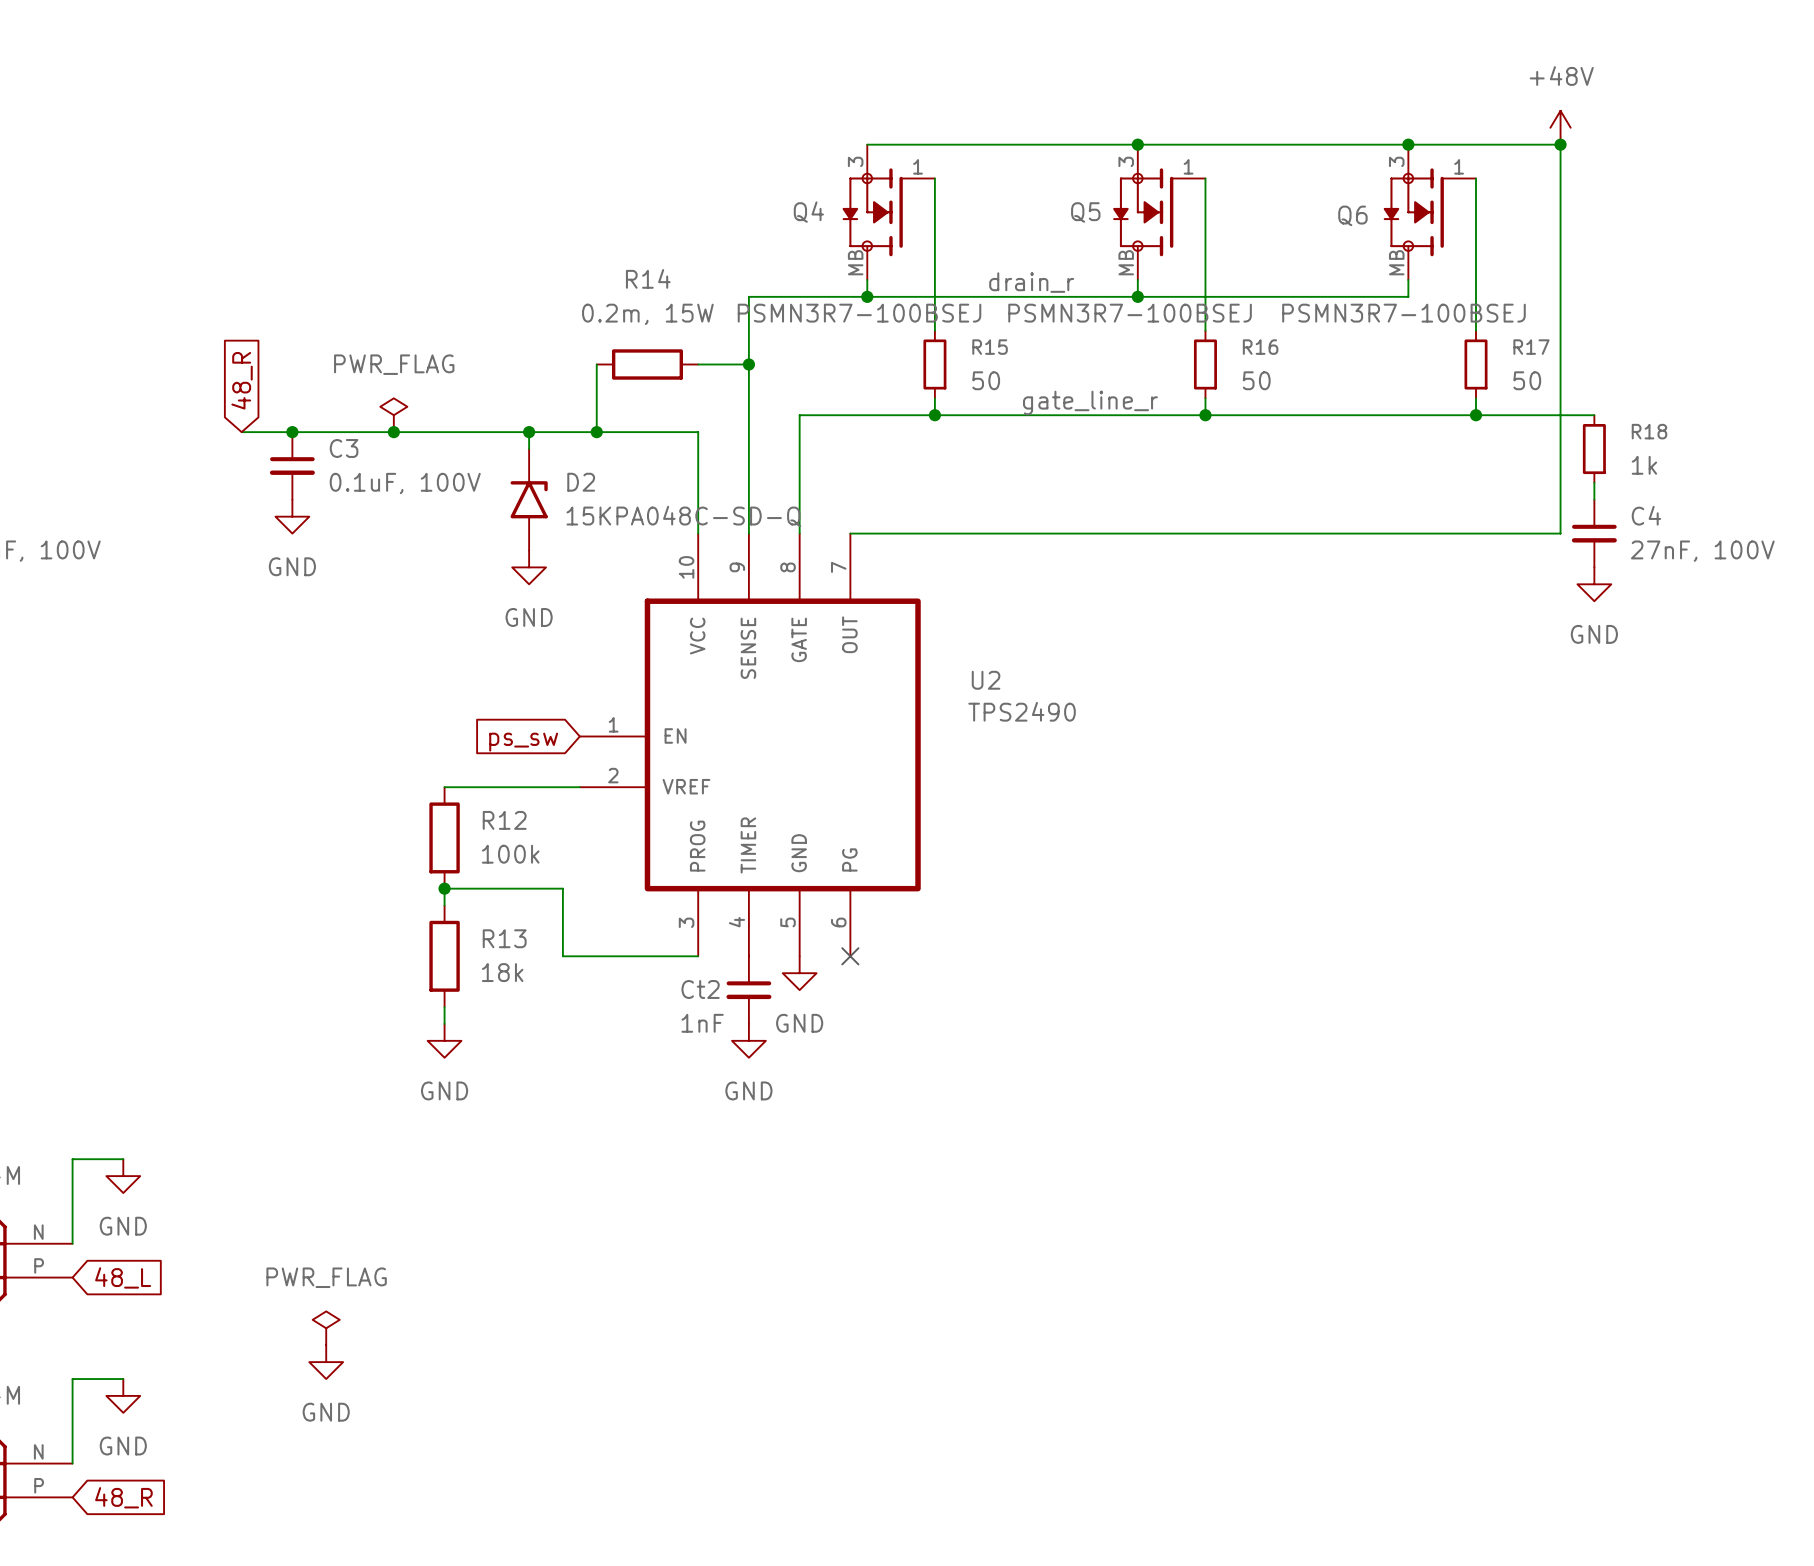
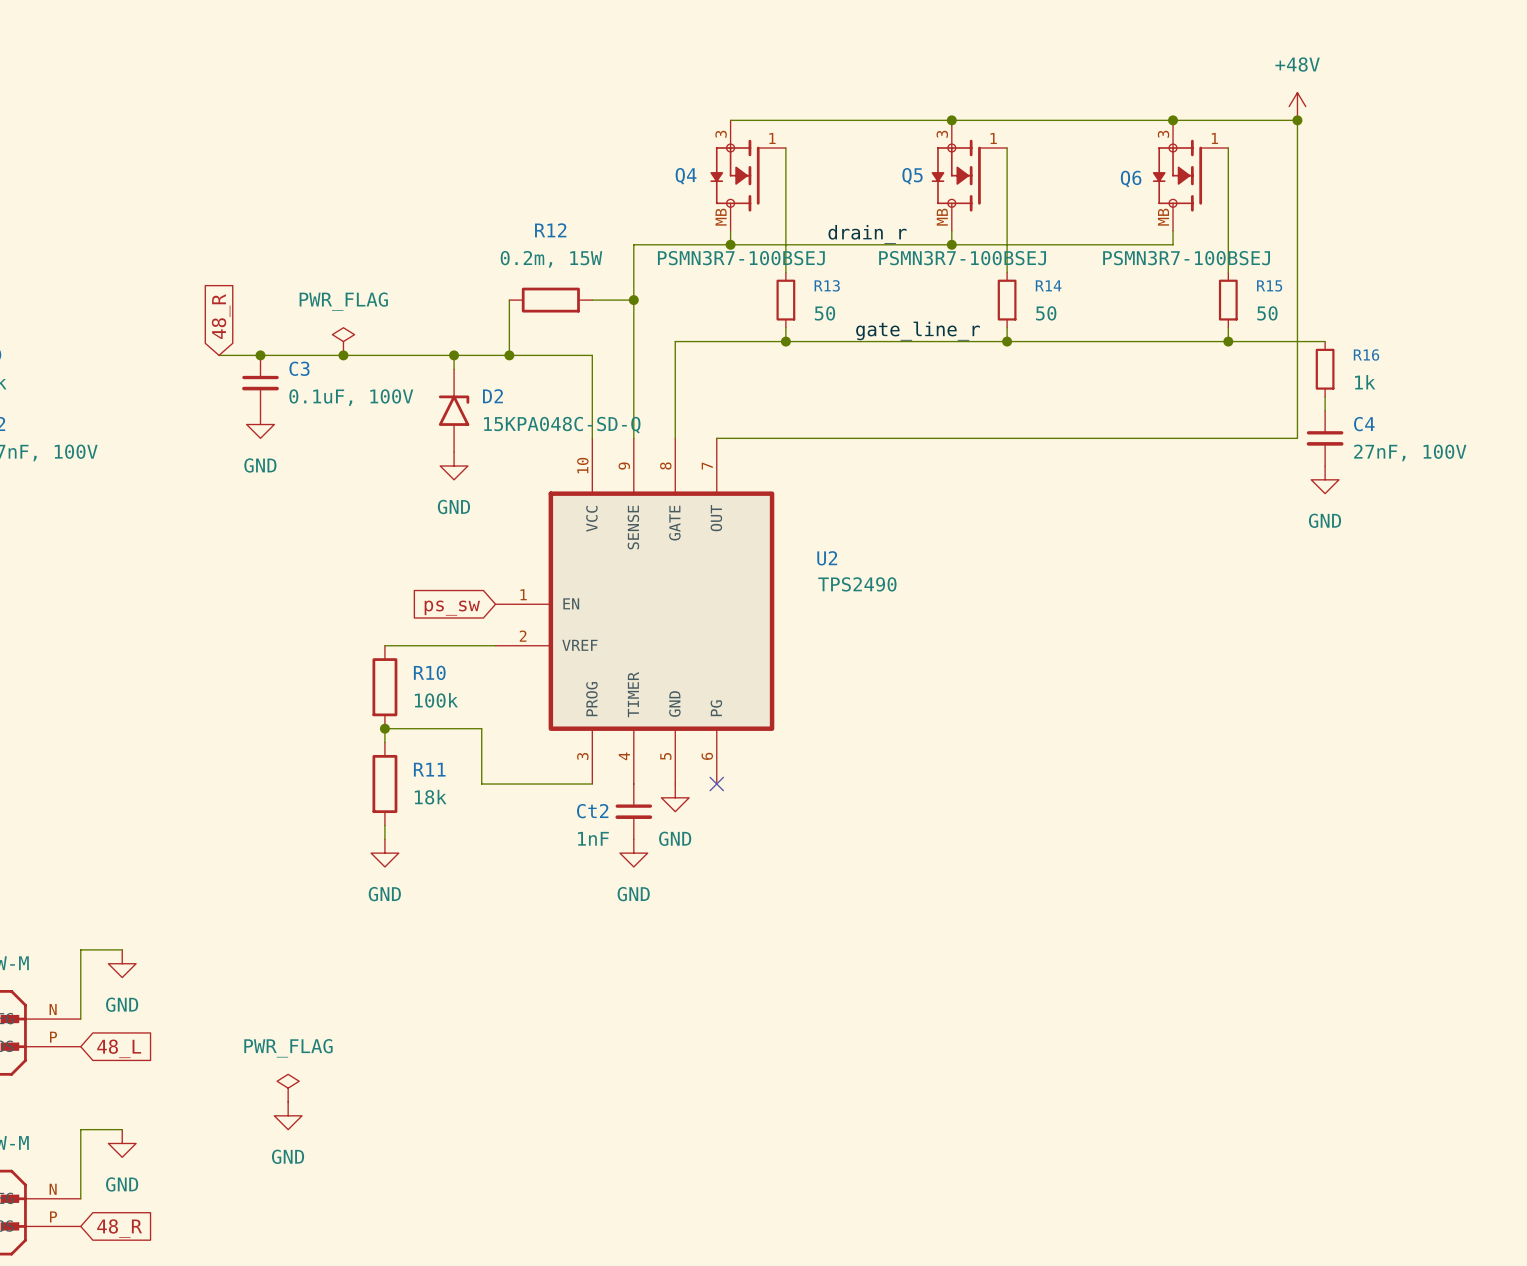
R14 name: R14 (648, 278) -> R12 (550, 230)
R15 name: R15 (990, 347) -> R13 (827, 285)
R16 name: R16 (1260, 347) -> R14 (1048, 285)
R17 name: R17 (1531, 347) -> R15 (1269, 285)
R18 name: R18 (1649, 431) -> R16 (1366, 354)
R12 name: R12 (504, 820) -> R10 (429, 672)
R13 name: R13 (504, 938) -> R11 (429, 769)

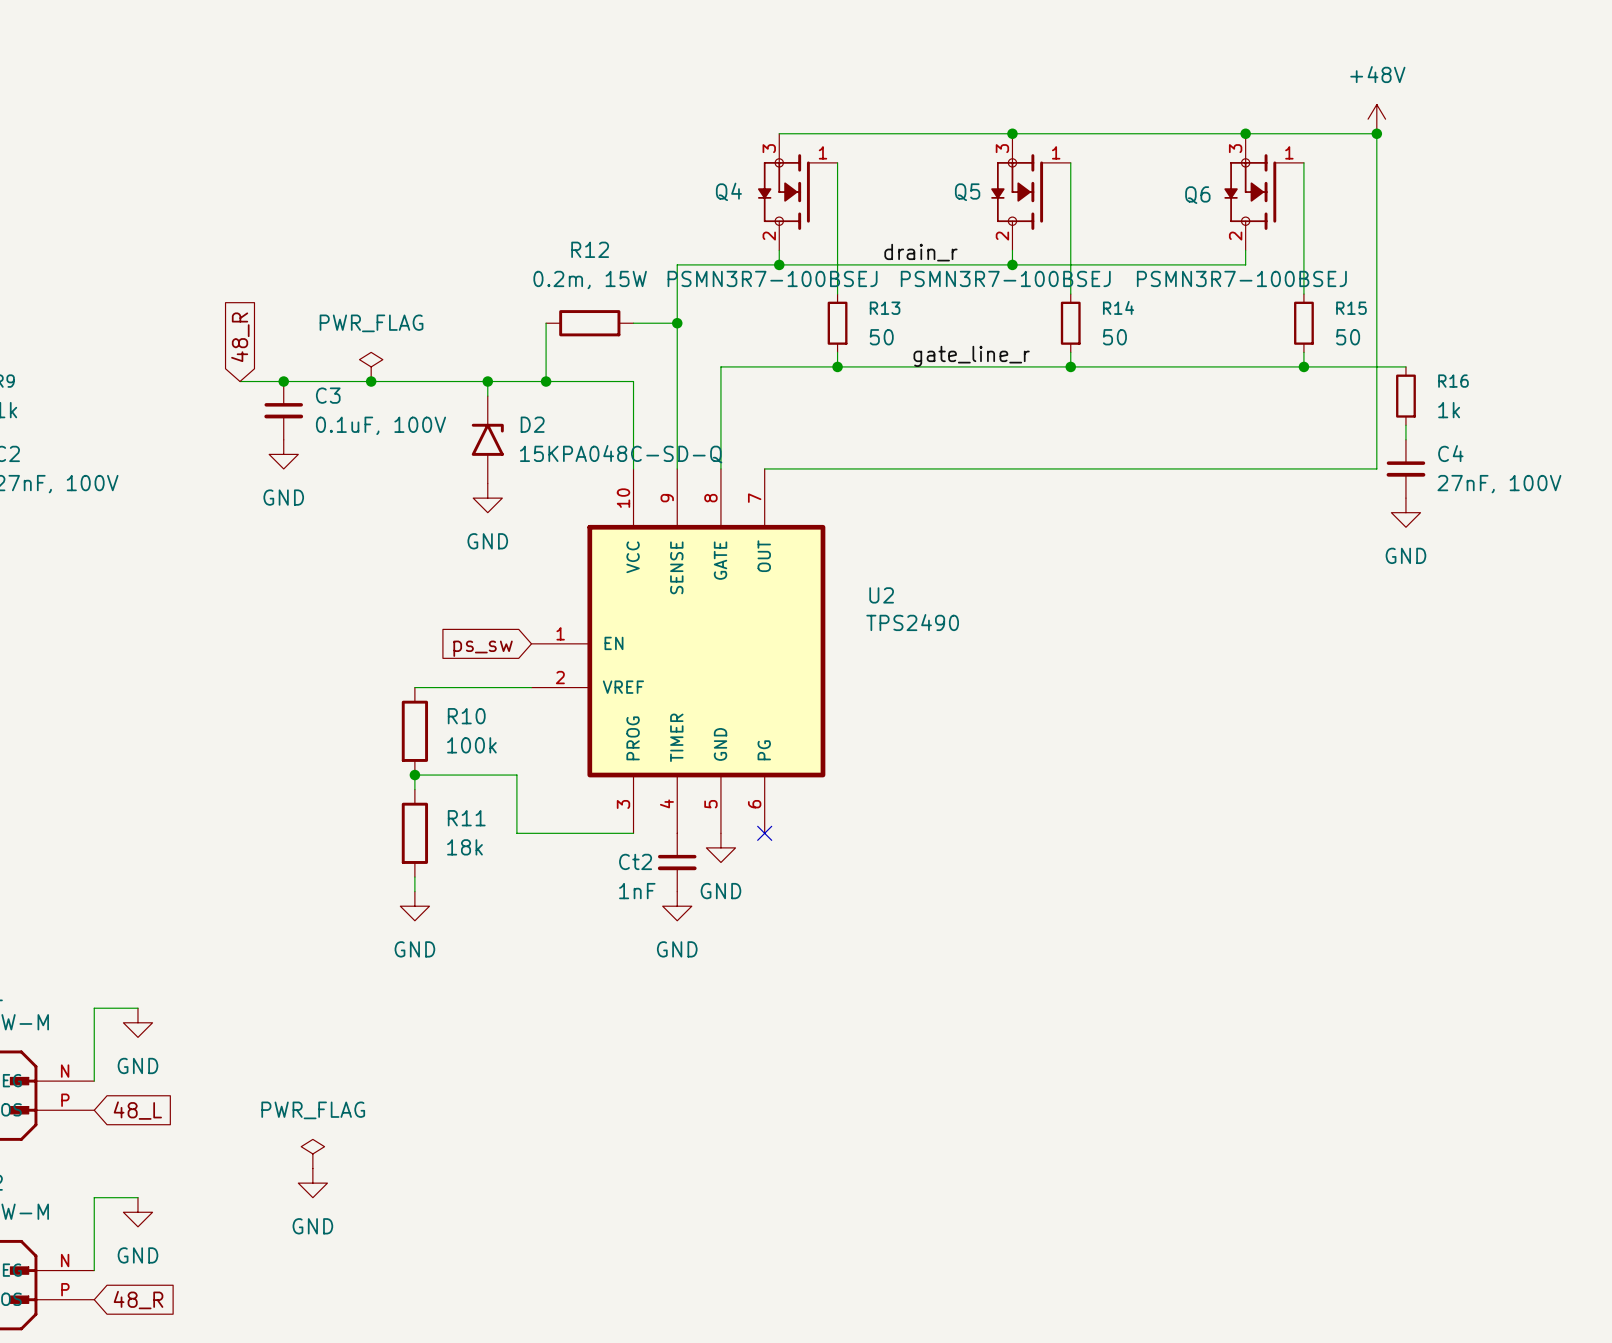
Q4 pin number: MB (721, 217) -> 2 (769, 236)
Q5 pin number: MB (942, 217) -> 2 (1002, 236)
Q6 pin number: MB (1163, 217) -> 2 (1235, 236)

